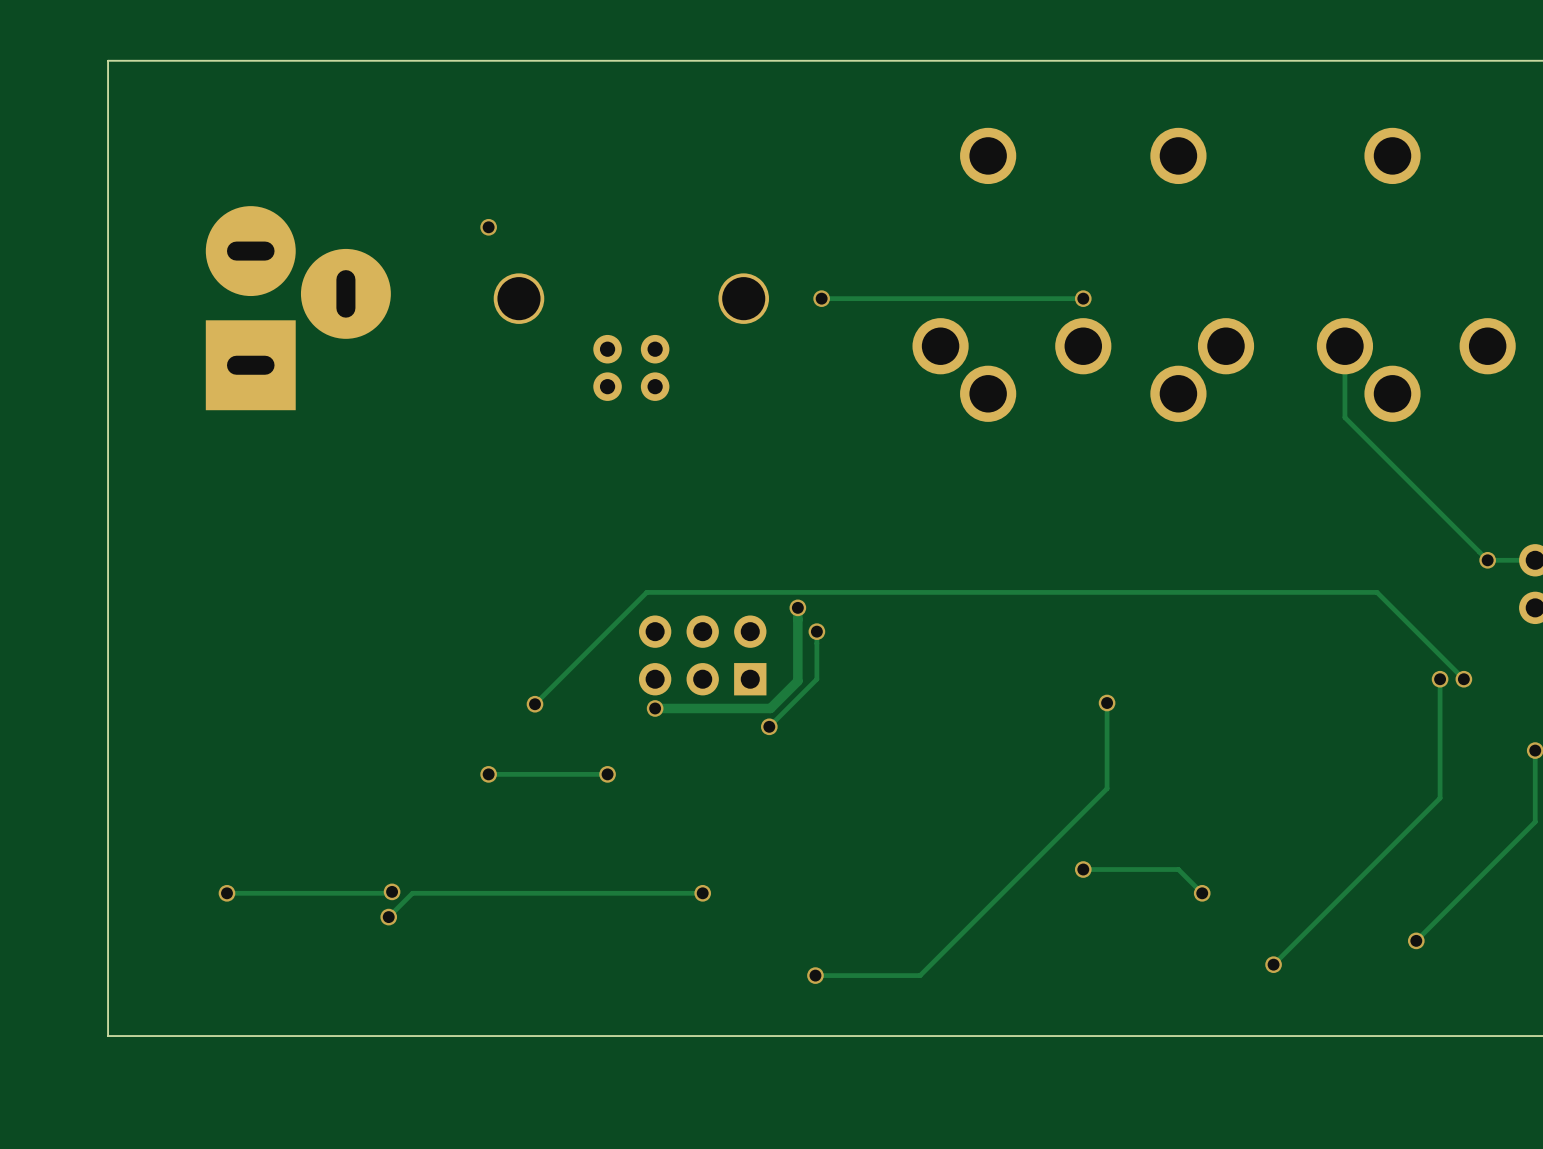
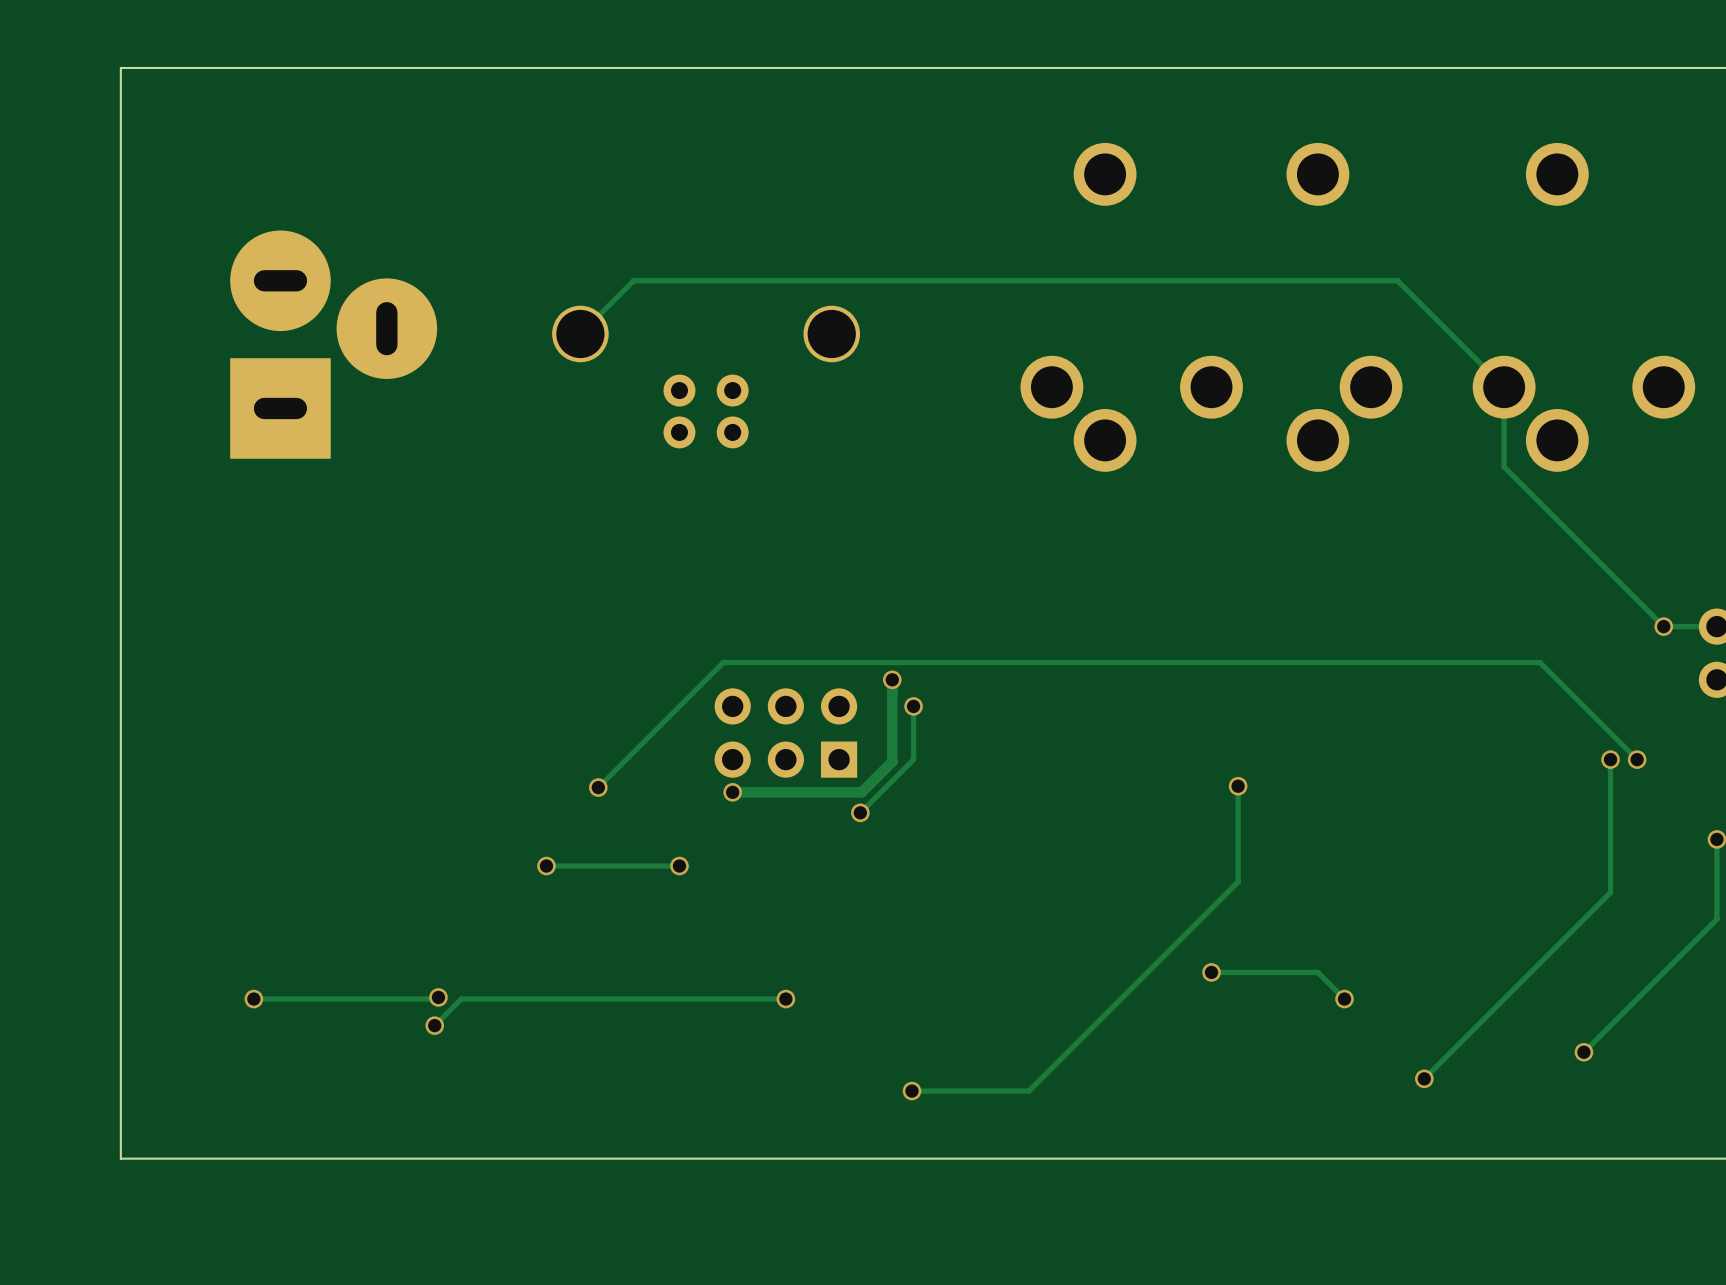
via: (488, 227) -> none
track: none -> (580, 333) (633, 280) (1397, 280) (1504, 387)
via: (821, 298) -> none
track: (1083, 298) (821, 298) -> none
via: (1083, 298) -> none

